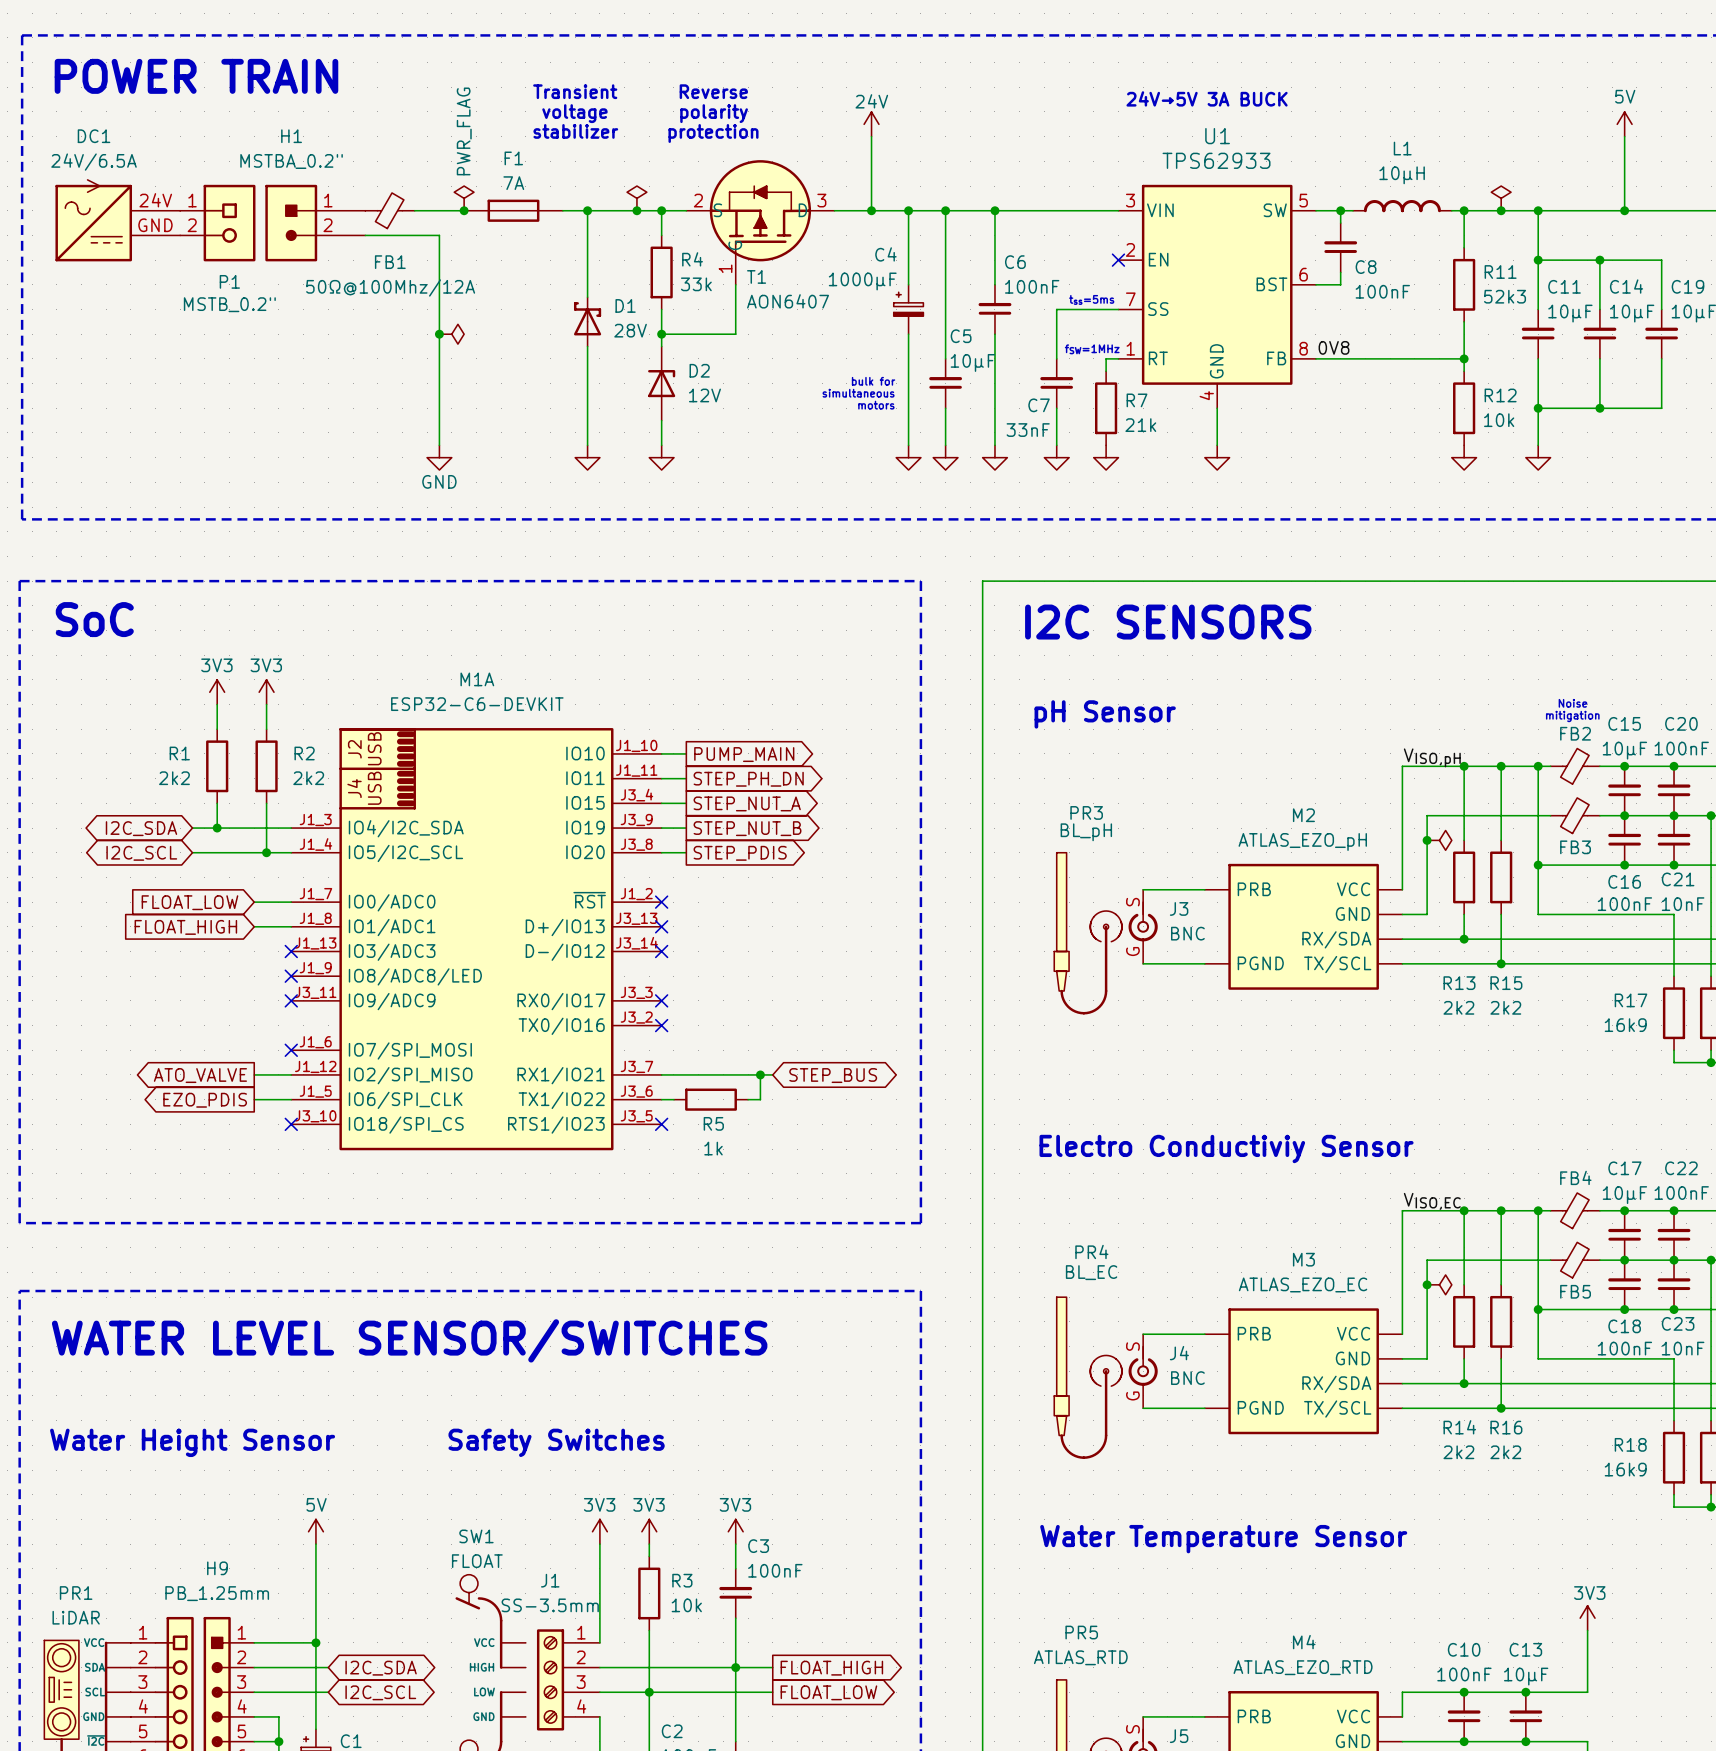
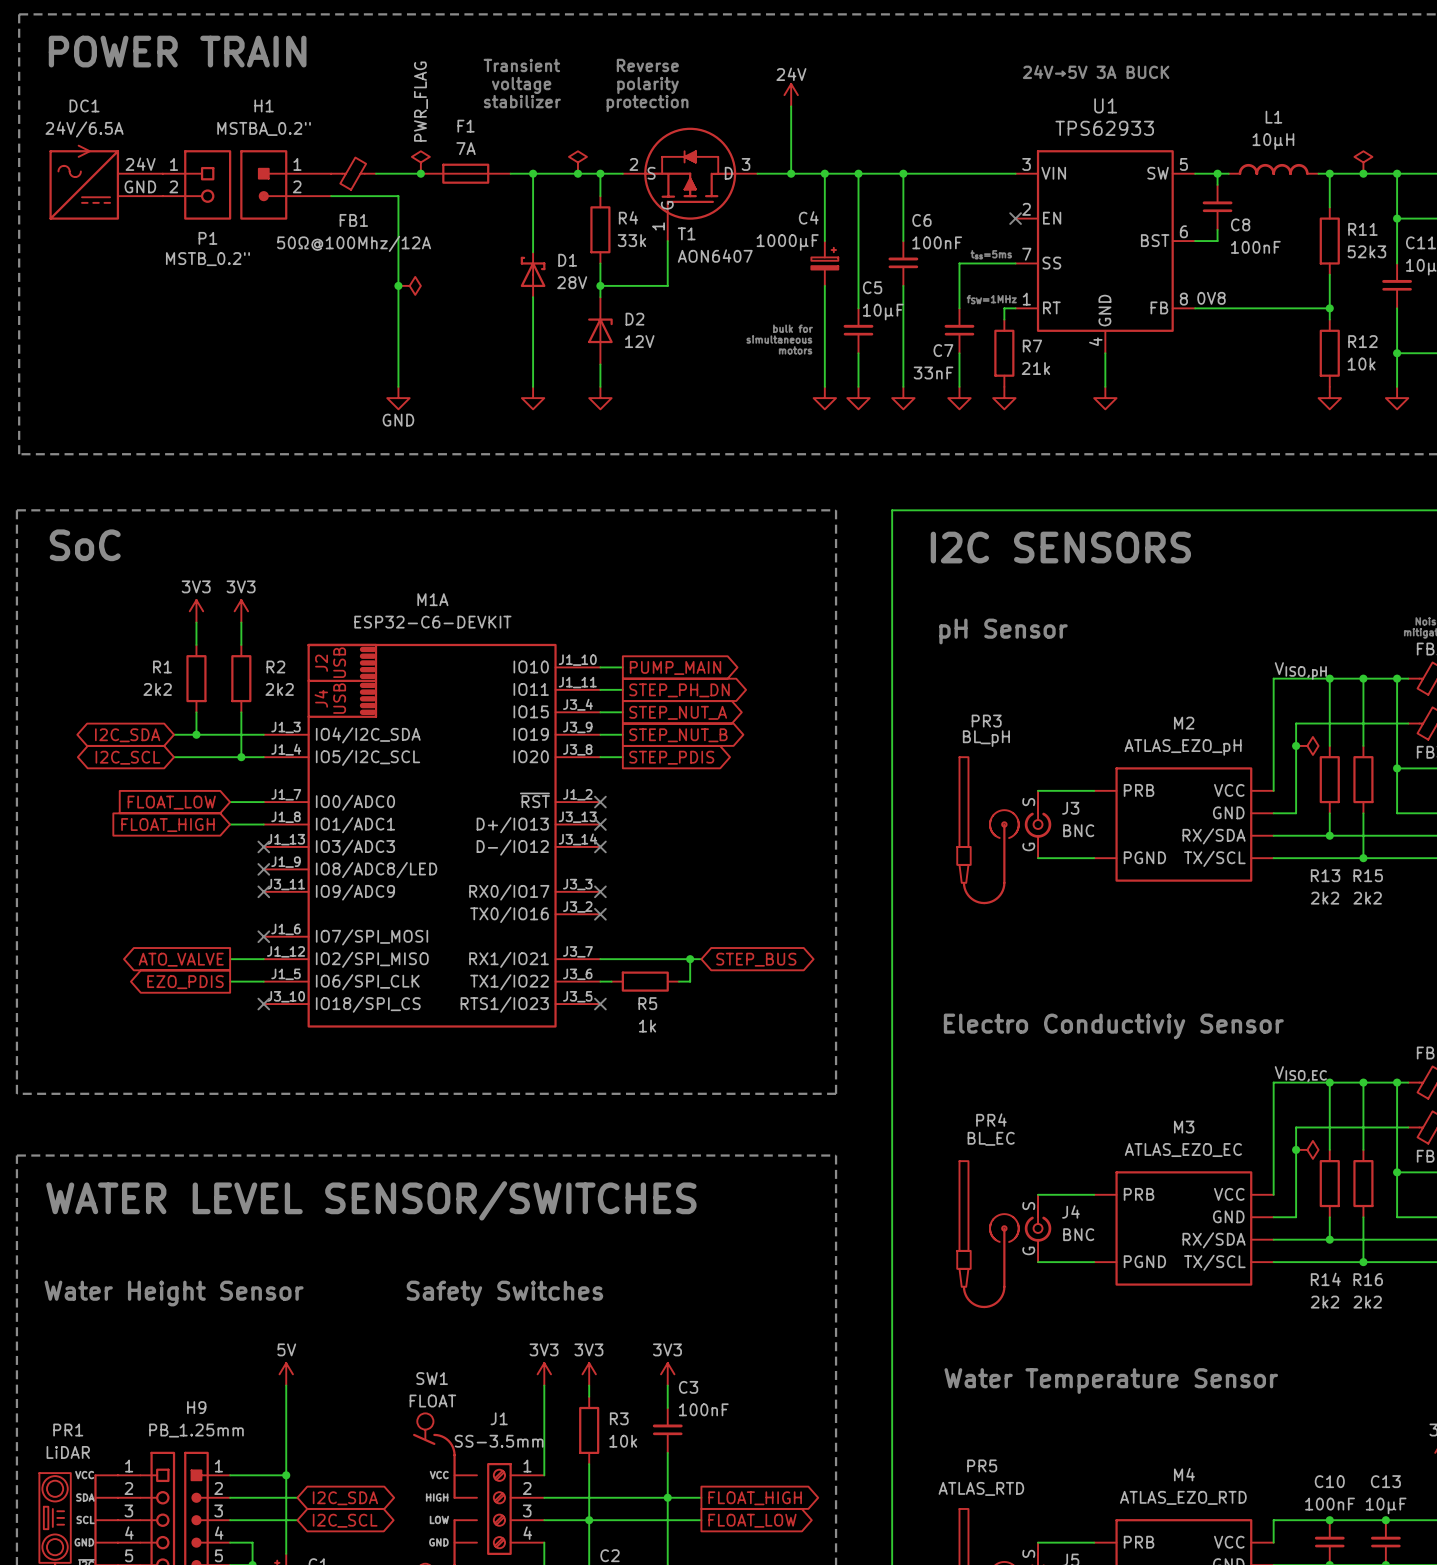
C4 flip: as is (908, 304) -> left-right (824, 258)

